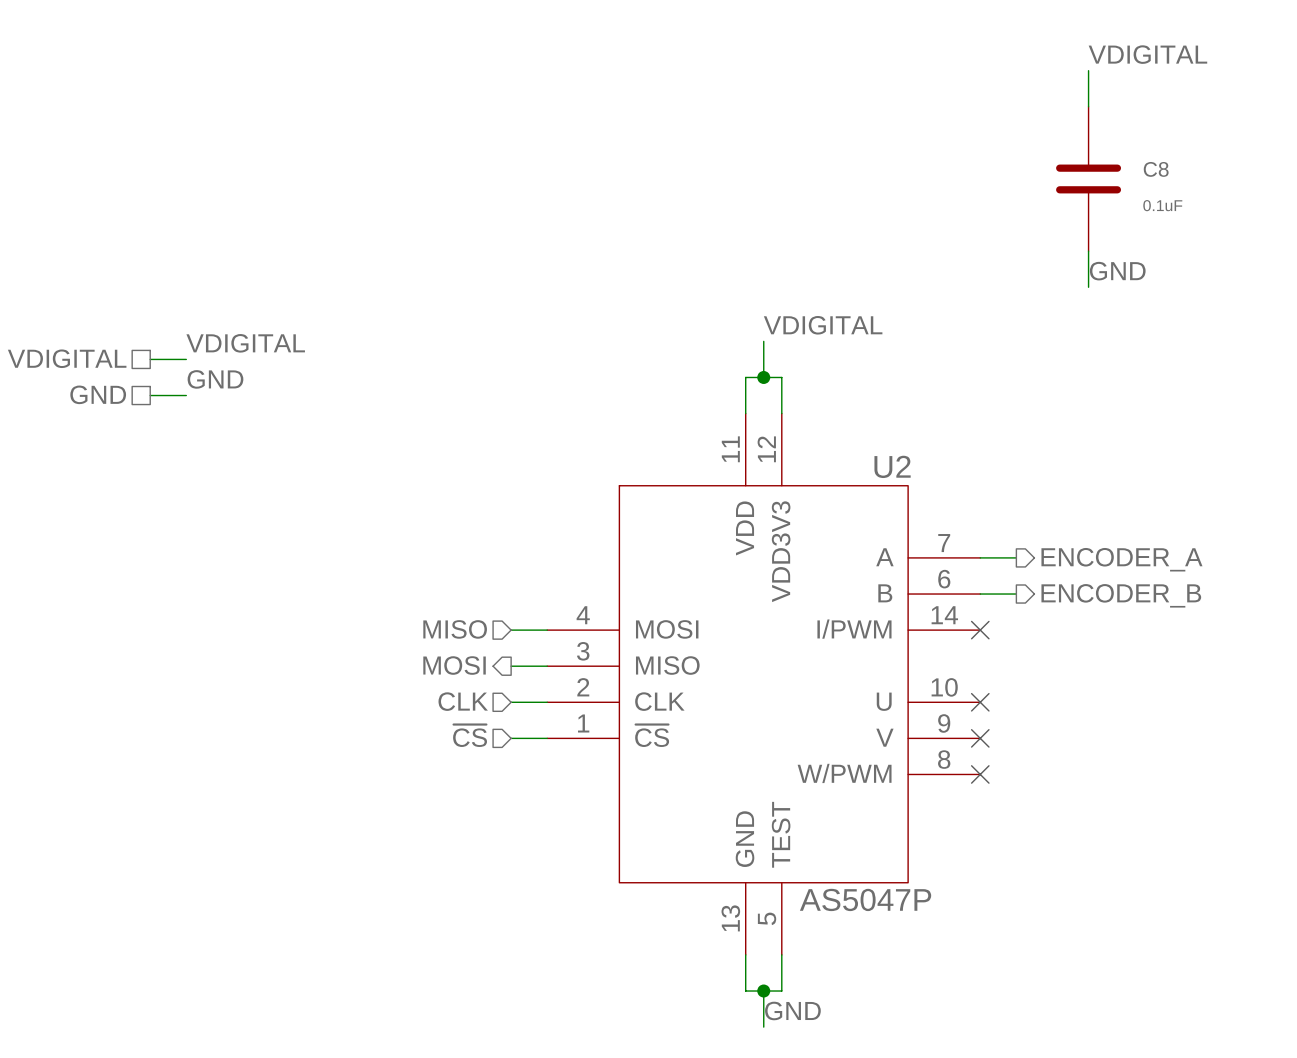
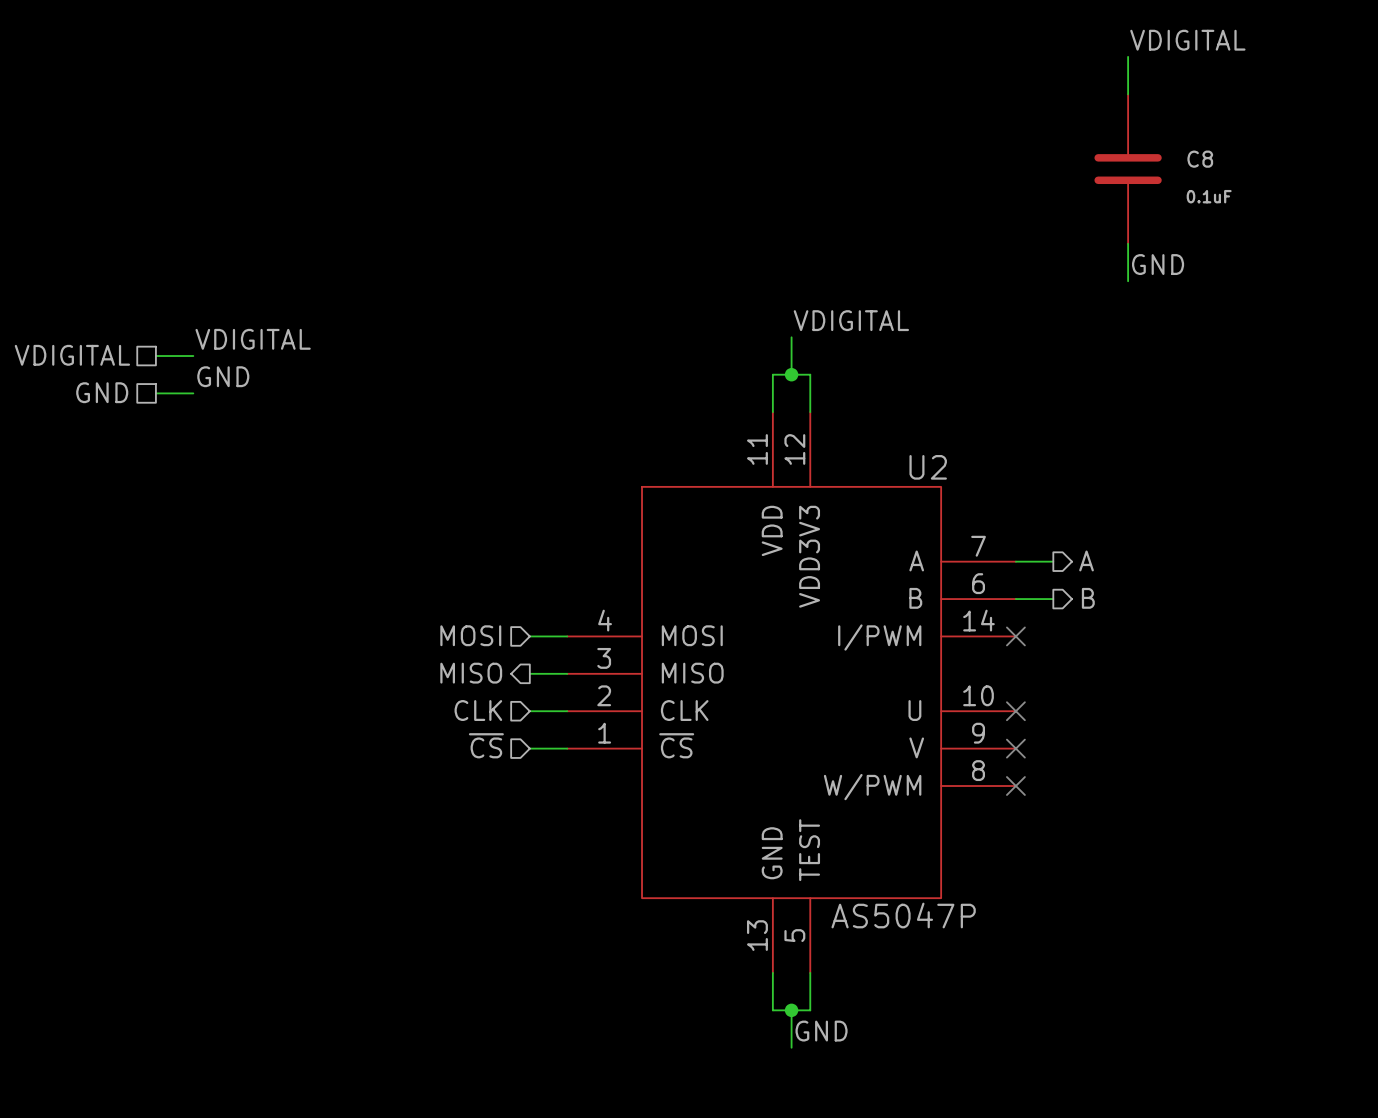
hierarchical label: ENCODER_A (1121, 559) -> A (1086, 560)
hierarchical label: ENCODER_B (1121, 595) -> B (1088, 598)
hierarchical label: MISO (455, 629) -> MOSI (470, 635)
hierarchical label: MOSI (454, 665) -> MISO (471, 673)

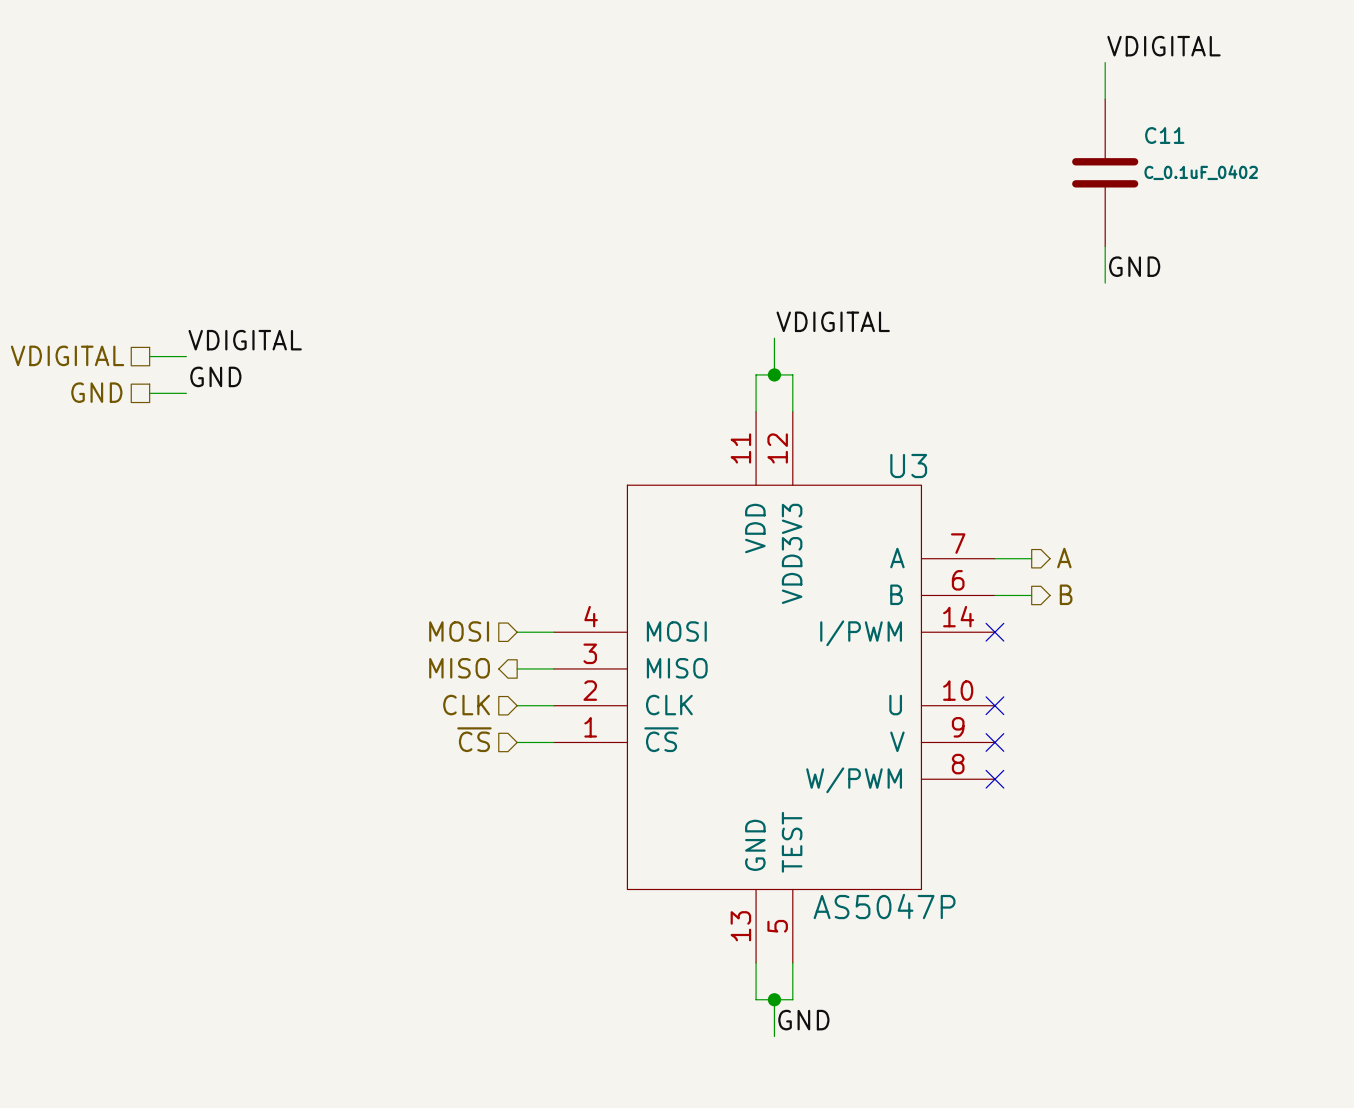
C8 name: C8 (1200, 159) -> C11 (1164, 135)
C8 value: 0.1uF (1209, 196) -> C_0.1uF_0402 (1201, 172)
U2 name: U2 (928, 467) -> U3 (908, 466)

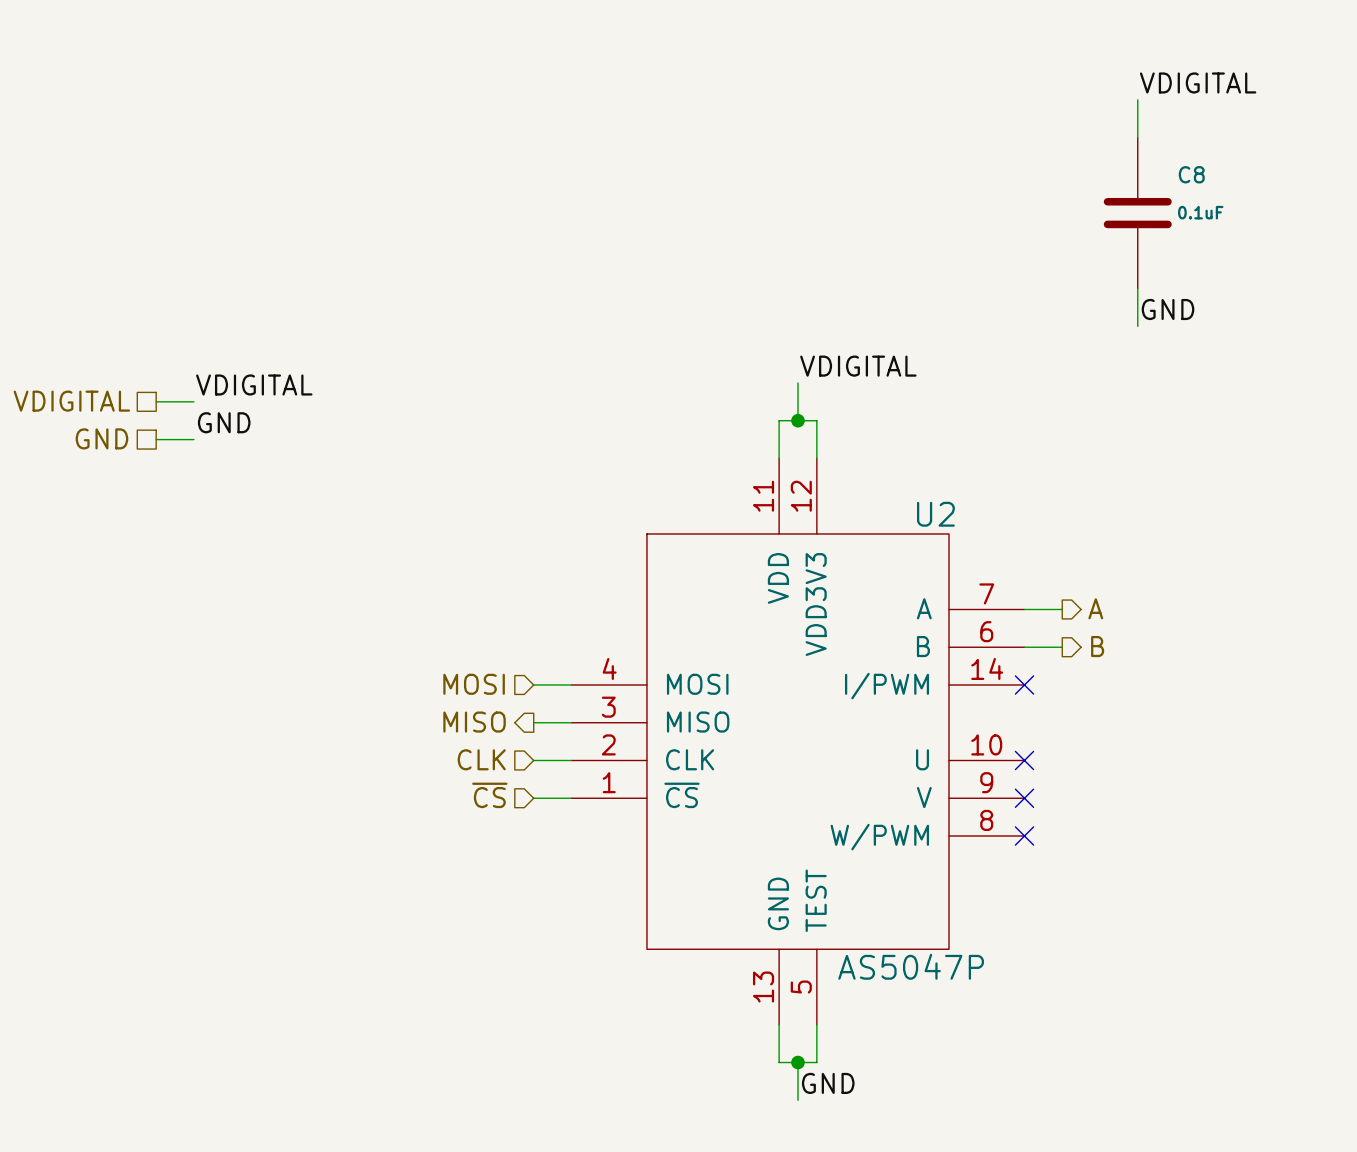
C11 name: C11 (1164, 135) -> C8 (1191, 174)
C11 value: C_0.1uF_0402 (1201, 172) -> 0.1uF (1200, 212)
U3 name: U3 (908, 466) -> U2 (935, 514)

